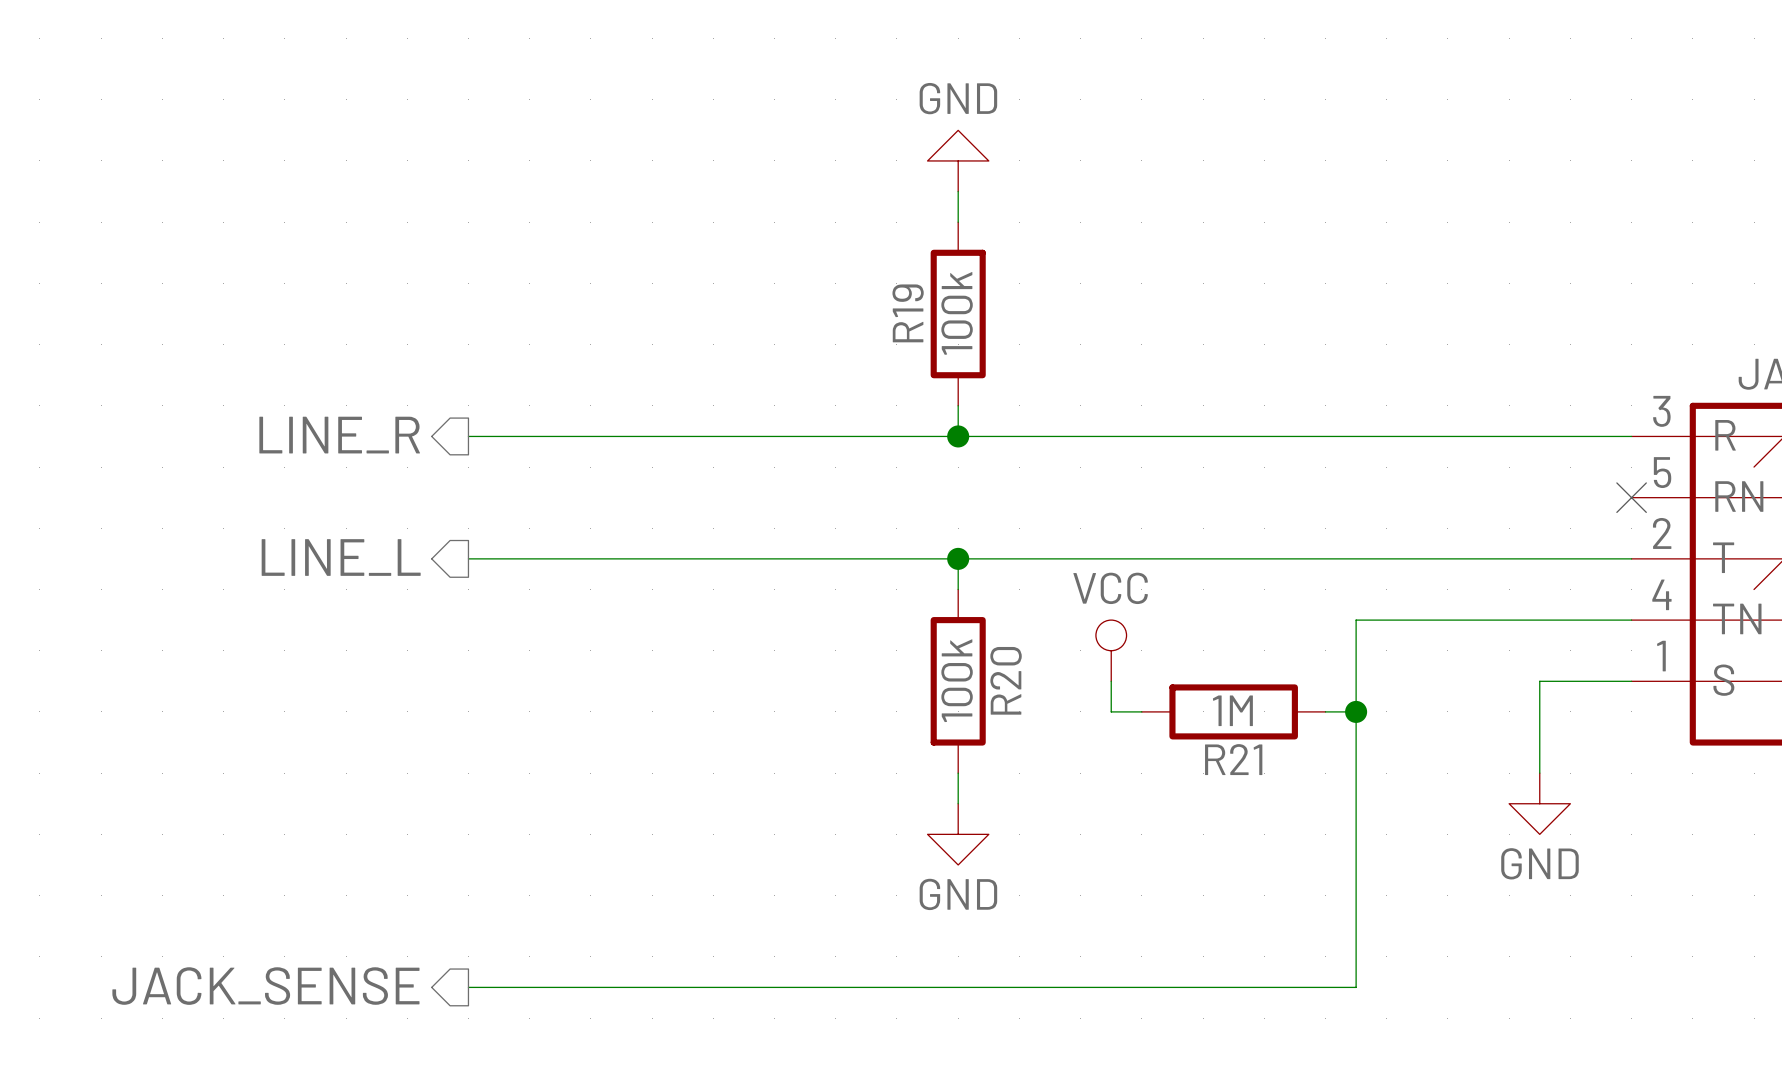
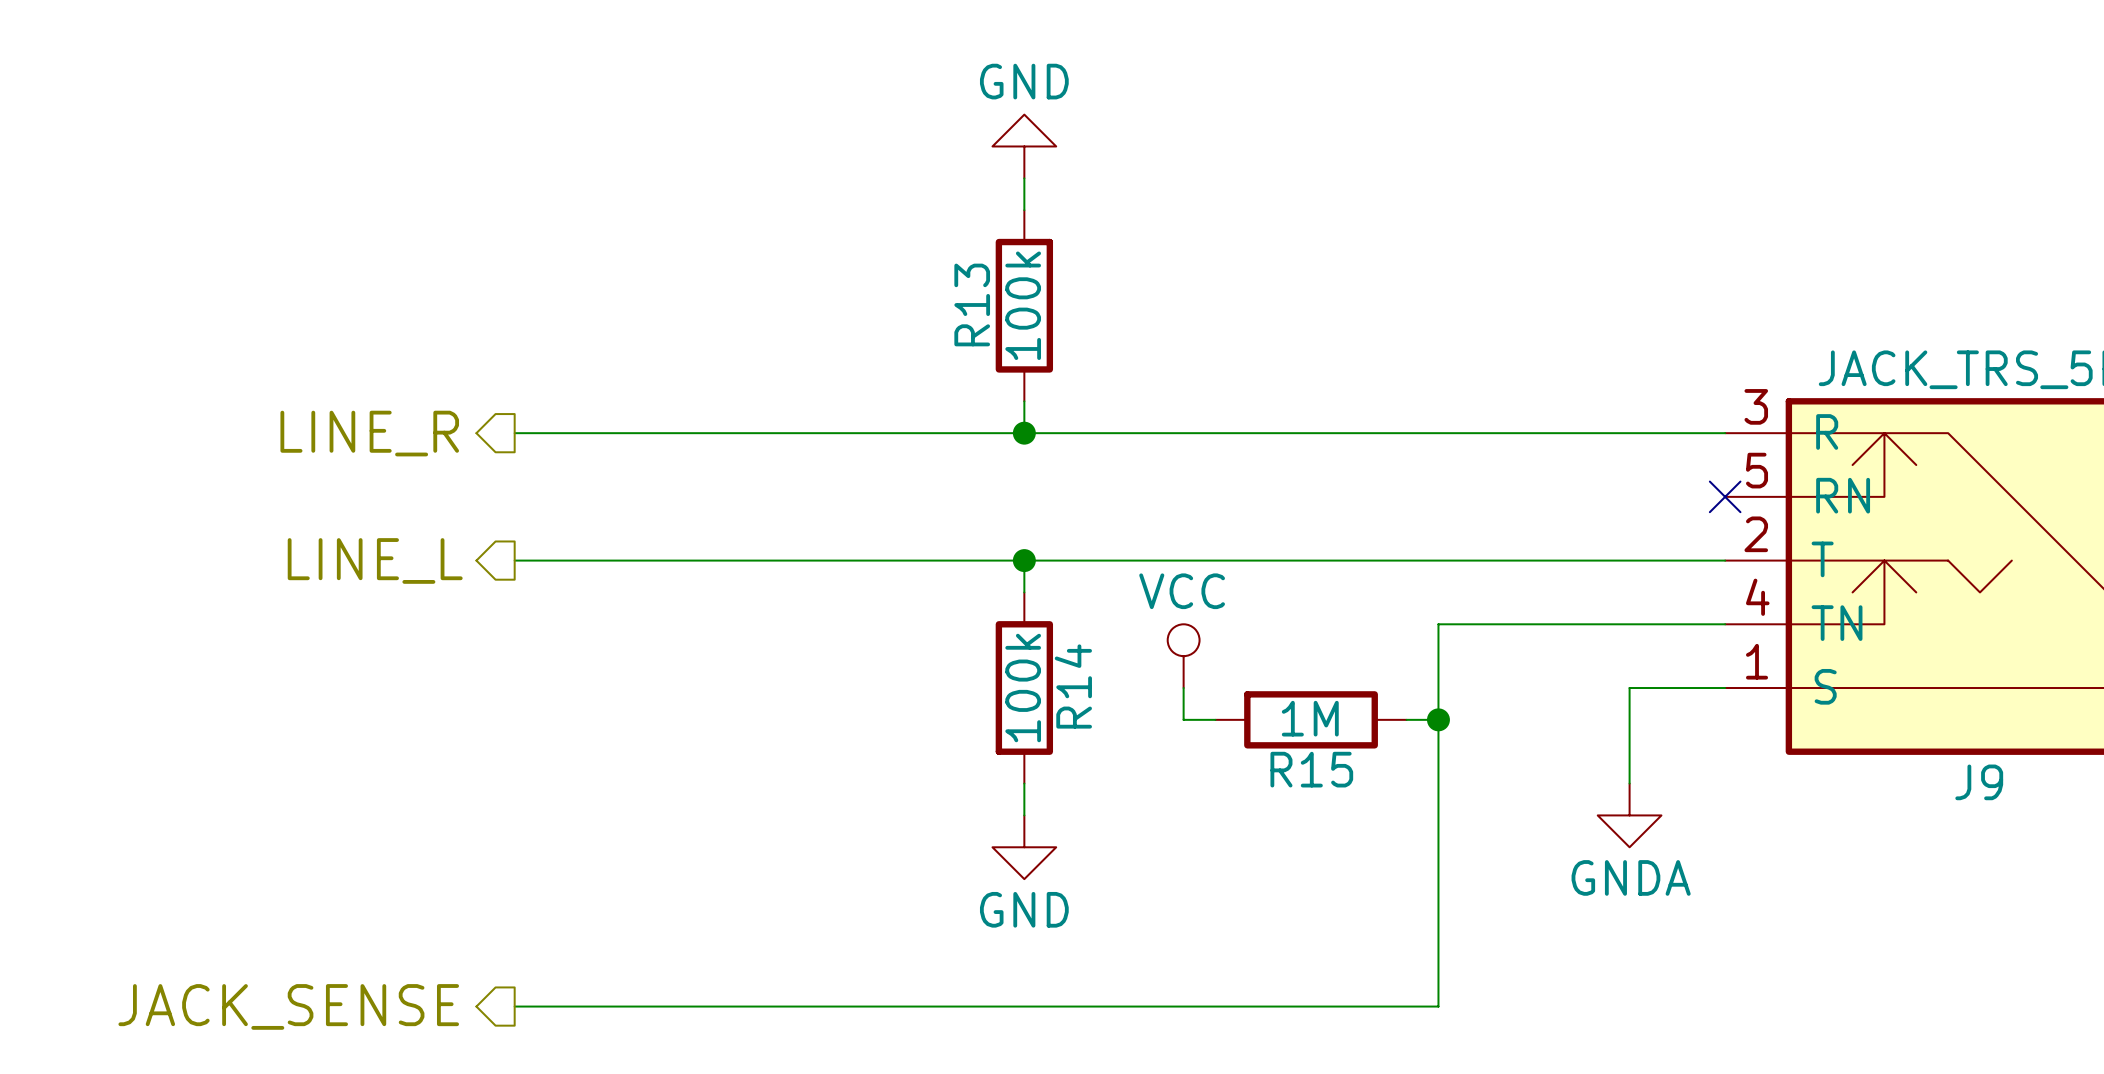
R19 name: R19 (908, 313) -> R13 (972, 304)
R20 name: R20 (1006, 680) -> R14 (1073, 686)
R21 name: R21 (1233, 759) -> R15 (1311, 769)
power symbol: GND (1539, 803) -> GNDA (1629, 815)

